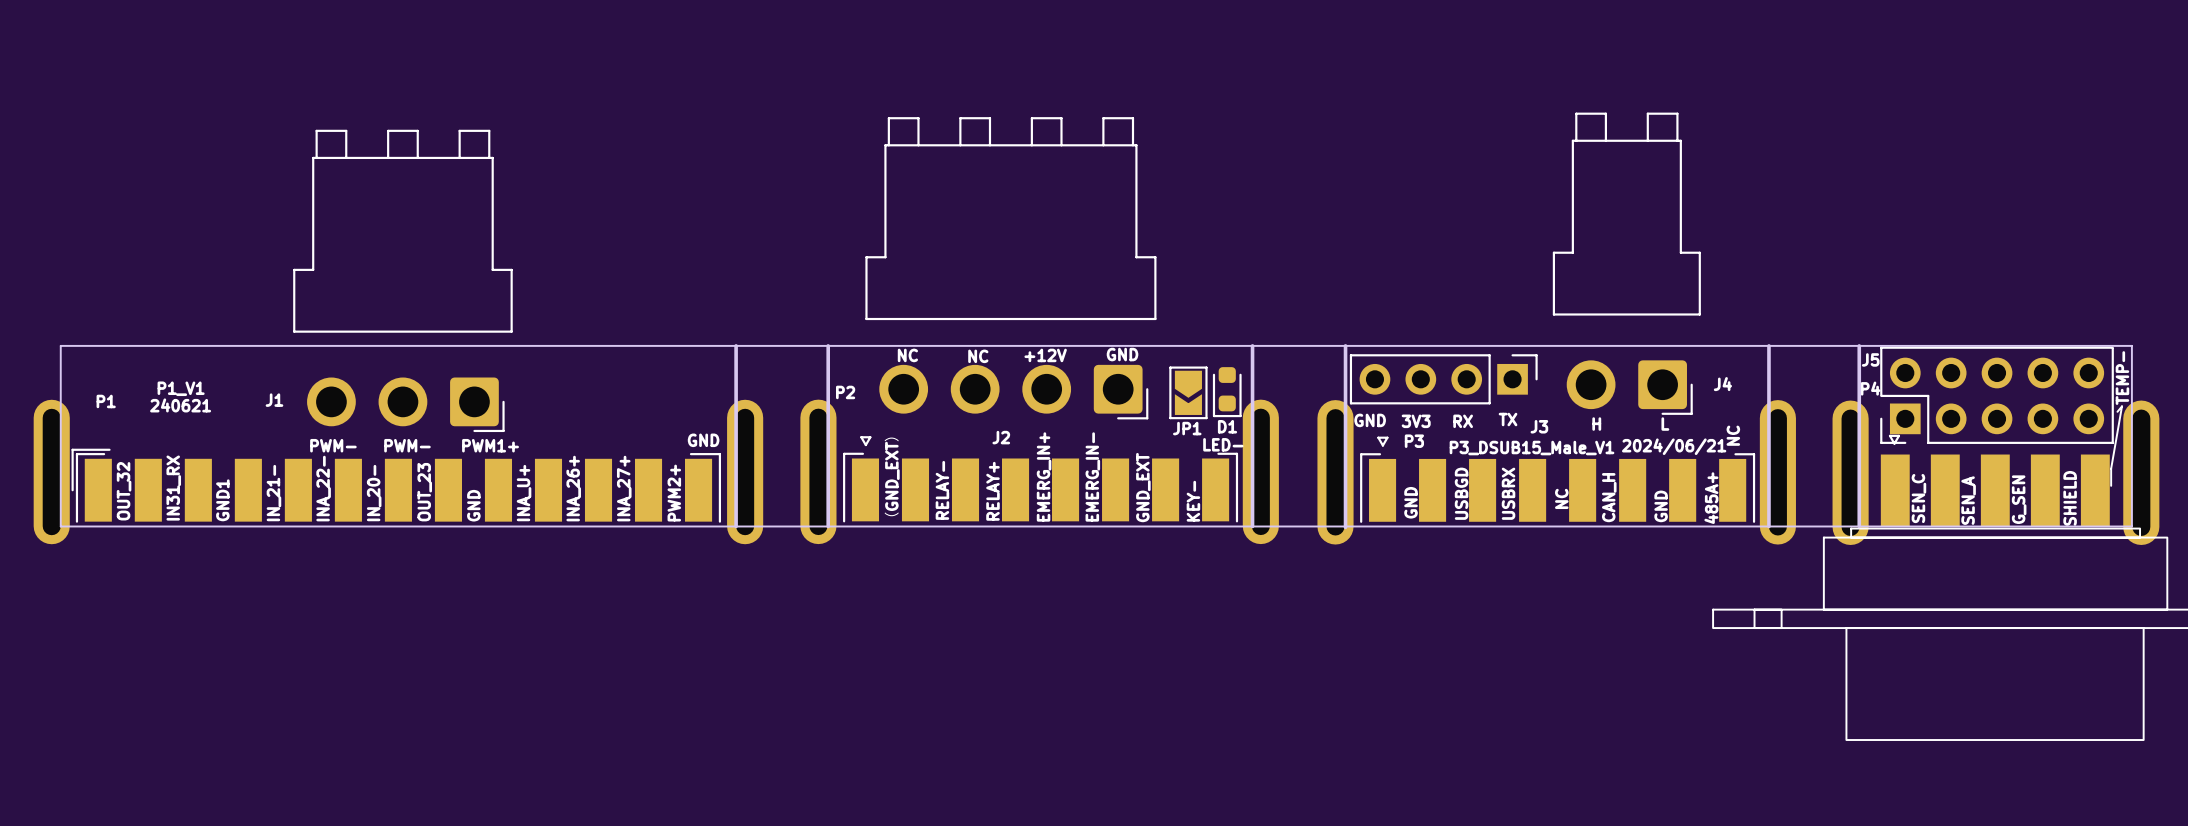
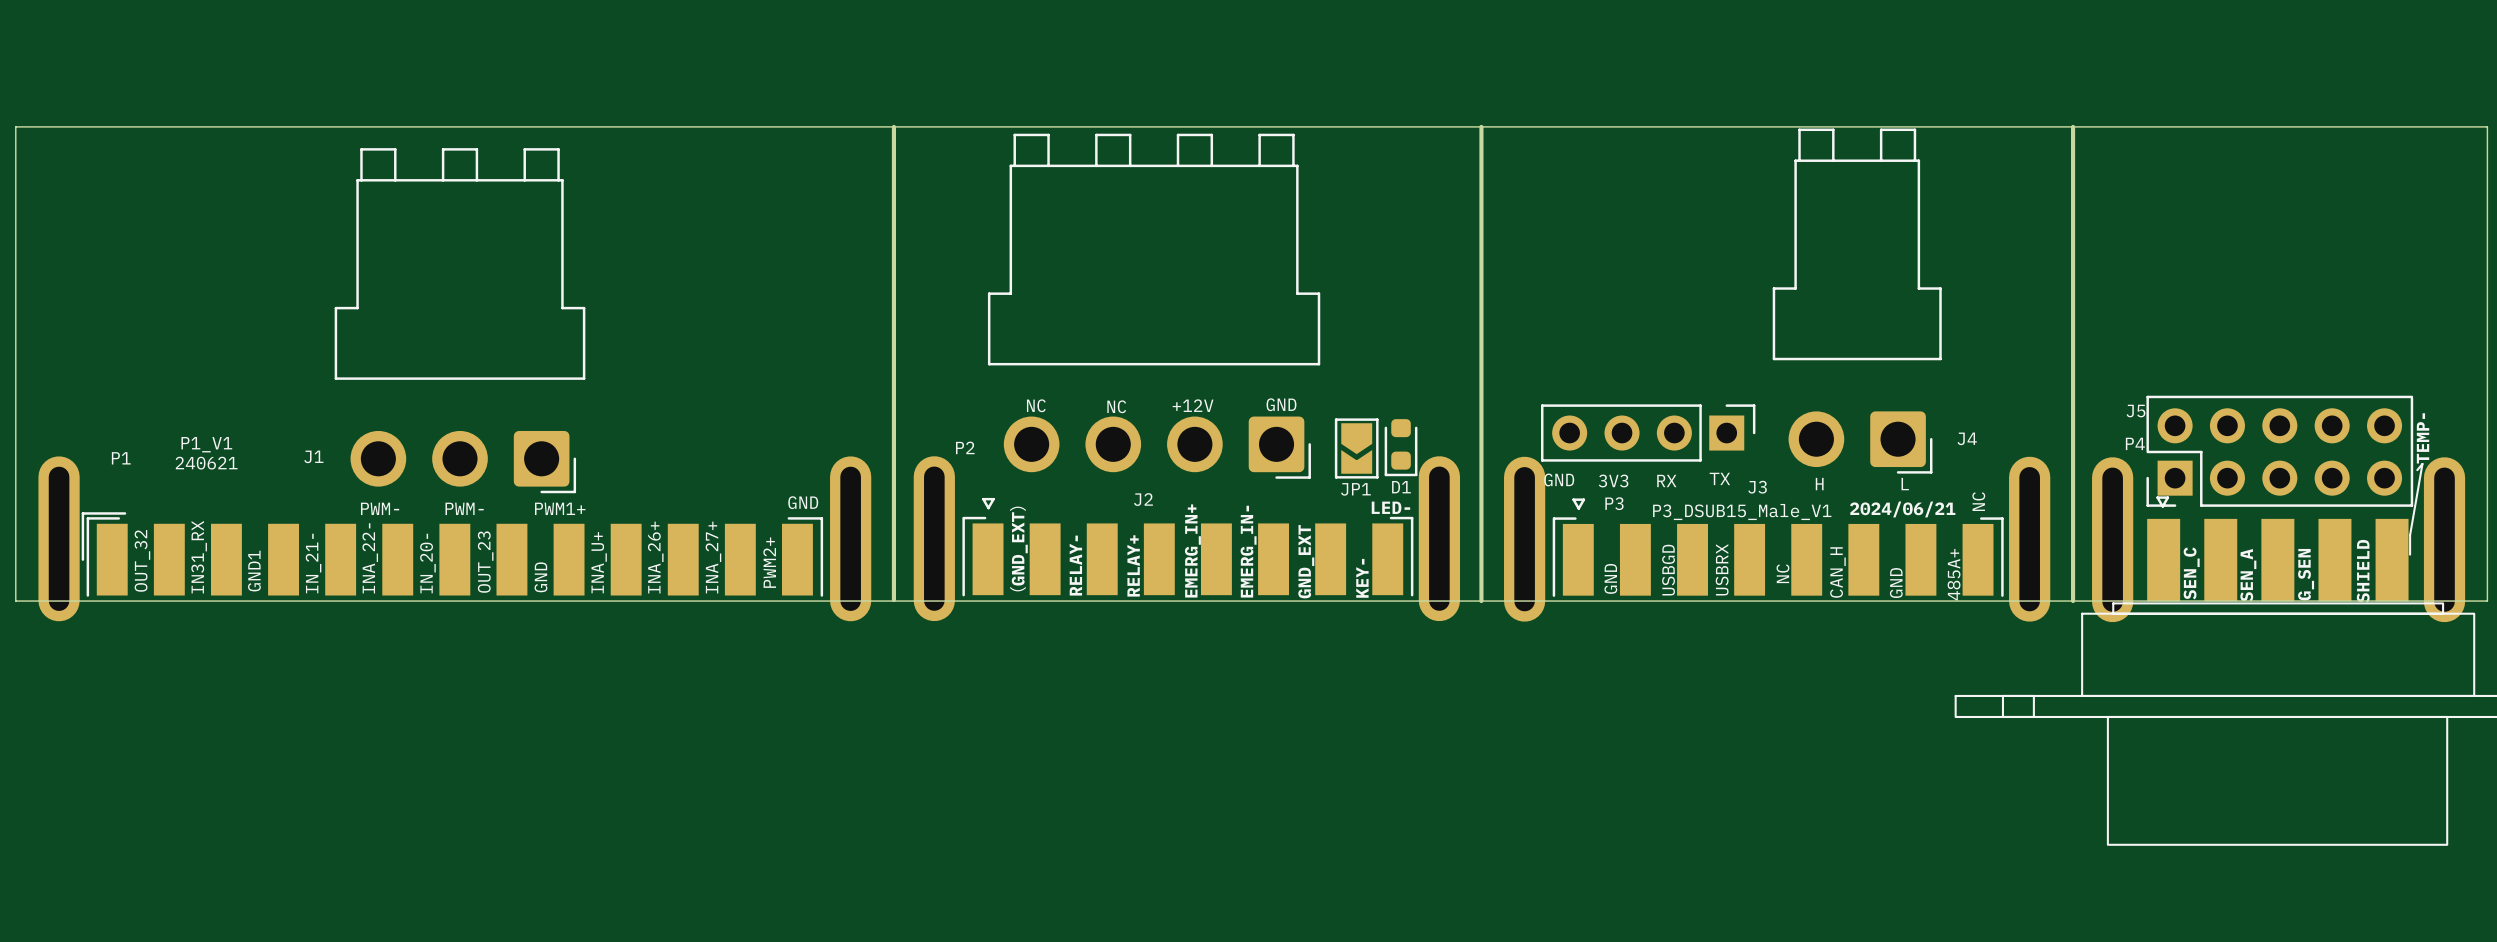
board edge: none -> (893, 126) (893, 600)
board edge: none -> (1481, 126) (1481, 601)
board edge: none -> (2073, 126) (2073, 601)
board edge: (736, 345) (736, 526) -> none
board edge: (828, 345) (828, 526) -> none
board edge: (1252, 345) (1252, 526) -> none
board edge: (1345, 345) (1345, 527) -> none
board edge: (1768, 345) (1768, 526) -> none
board edge: (1859, 345) (1859, 526) -> none
board edge: (60, 526) (60, 345) (2131, 345) (2131, 526) -> (69, 601) (15, 601) (15, 126) (2487, 126) (2487, 601) (2433, 601)

